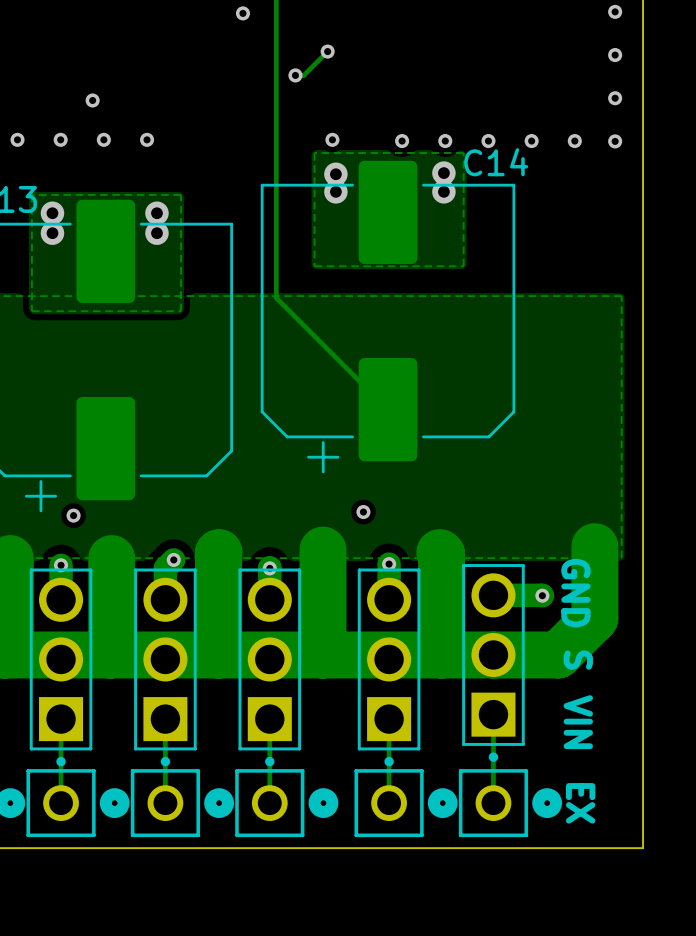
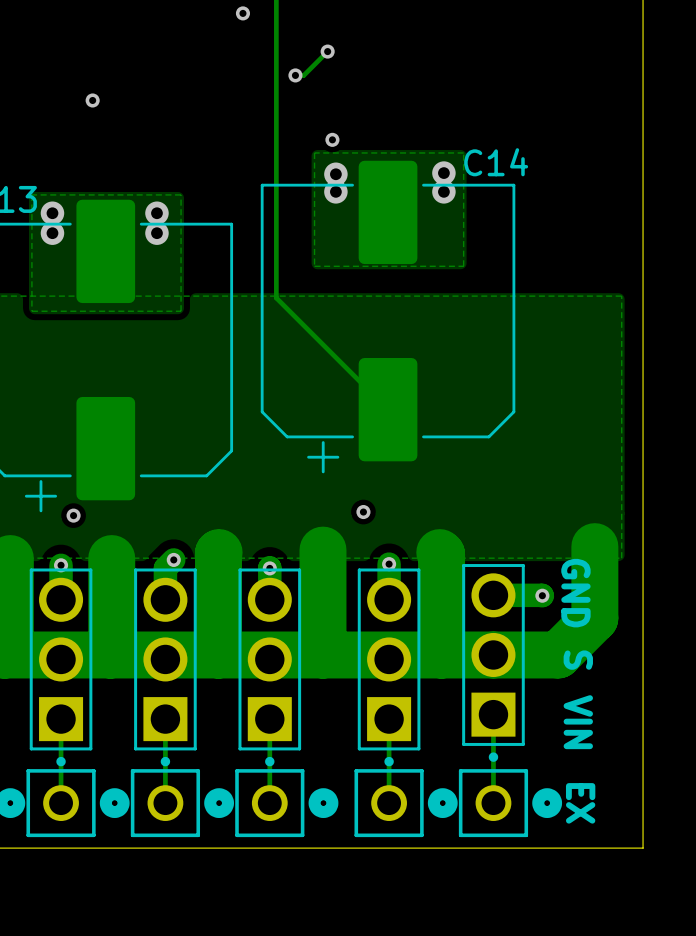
via: (615, 11) -> none
via: (615, 55) -> none
via: (615, 98) -> none
via: (17, 139) -> none
via: (60, 139) -> none
via: (103, 139) -> none
via: (147, 139) -> none
via: (402, 141) -> none
via: (445, 141) -> none
via: (488, 141) -> none
via: (531, 141) -> none
via: (574, 141) -> none
via: (615, 141) -> none

